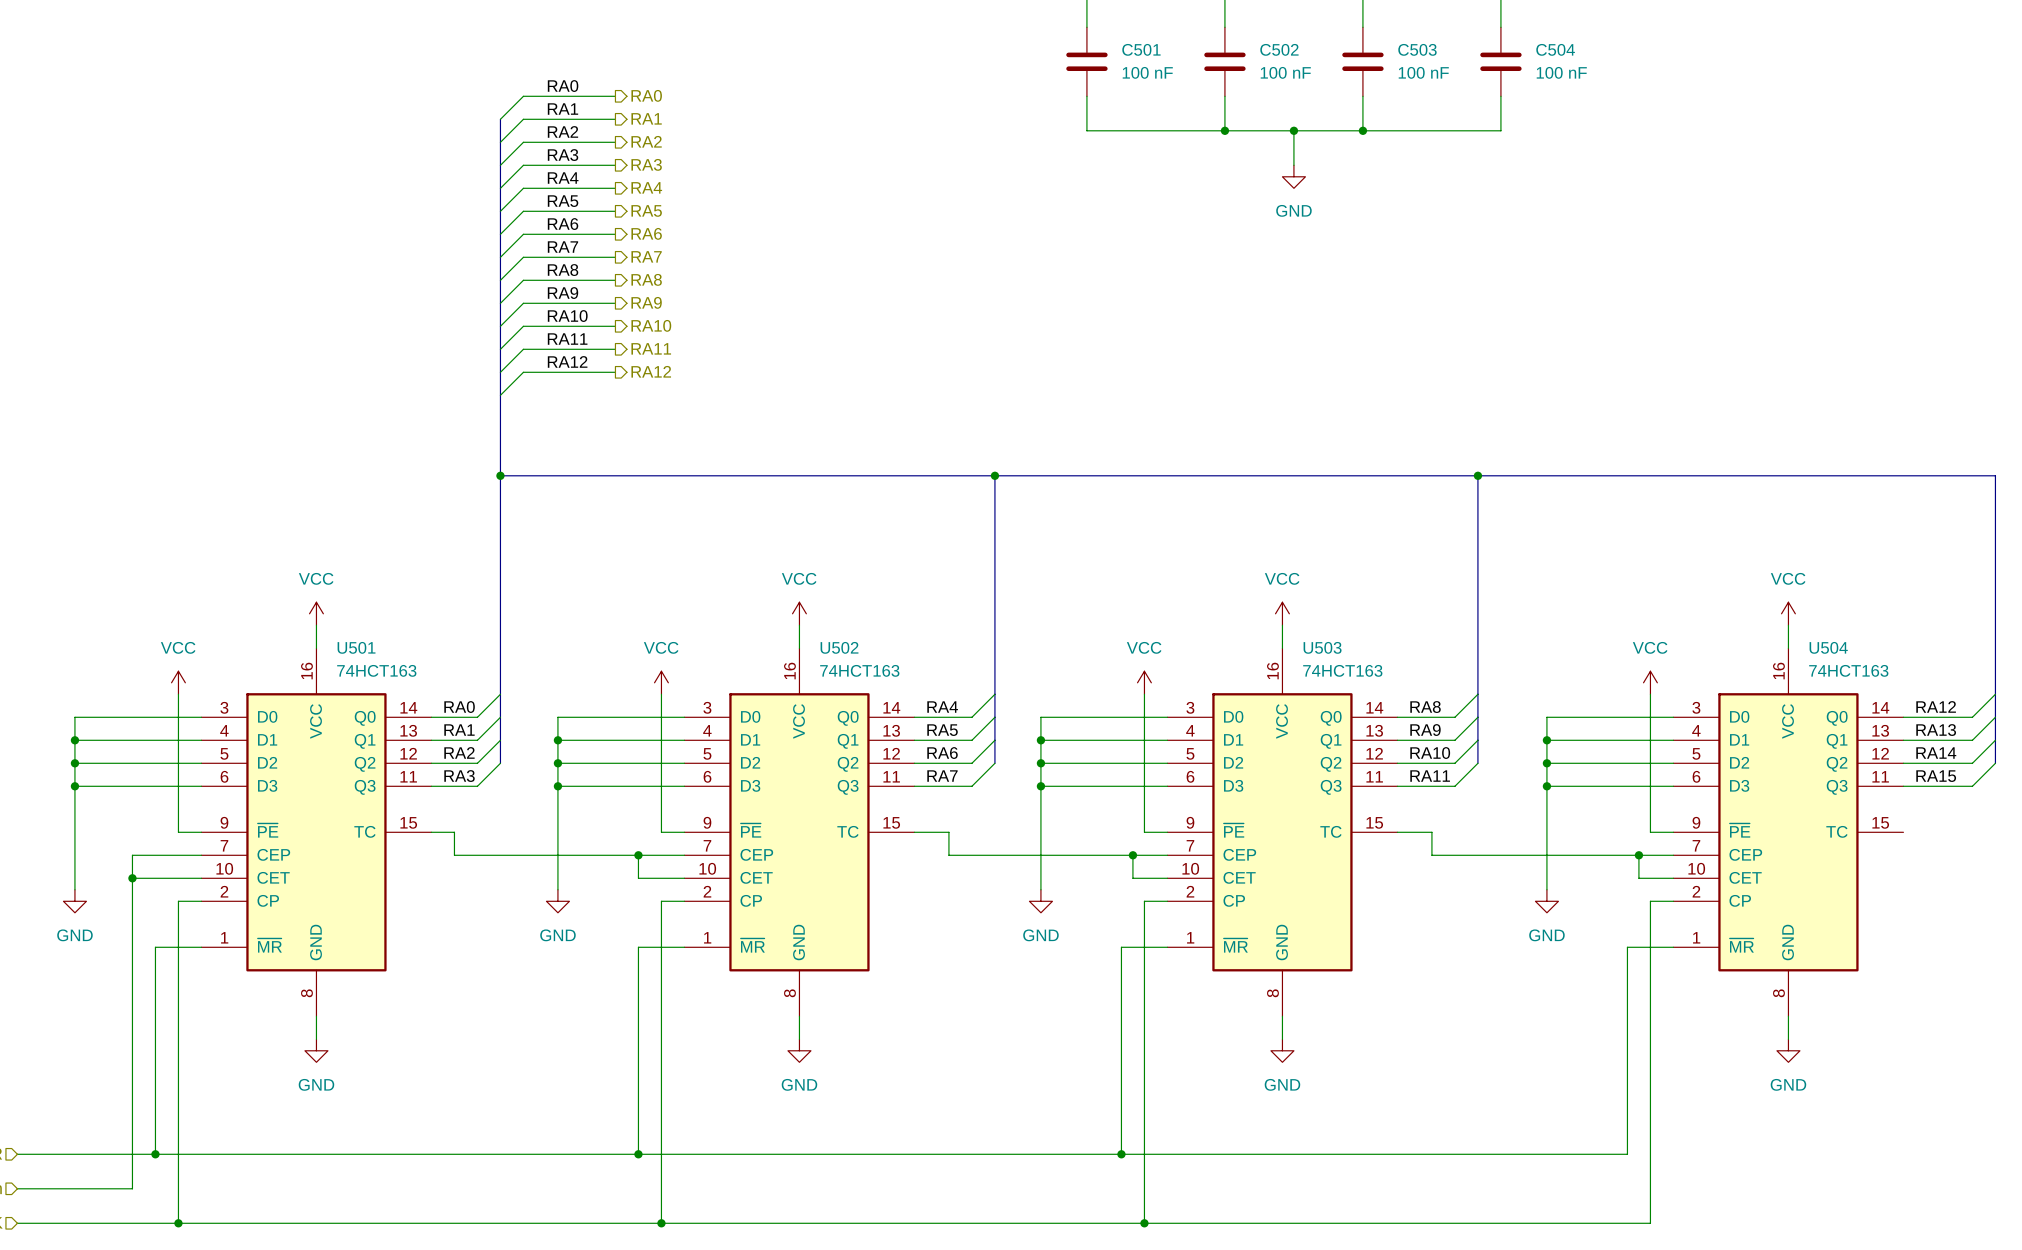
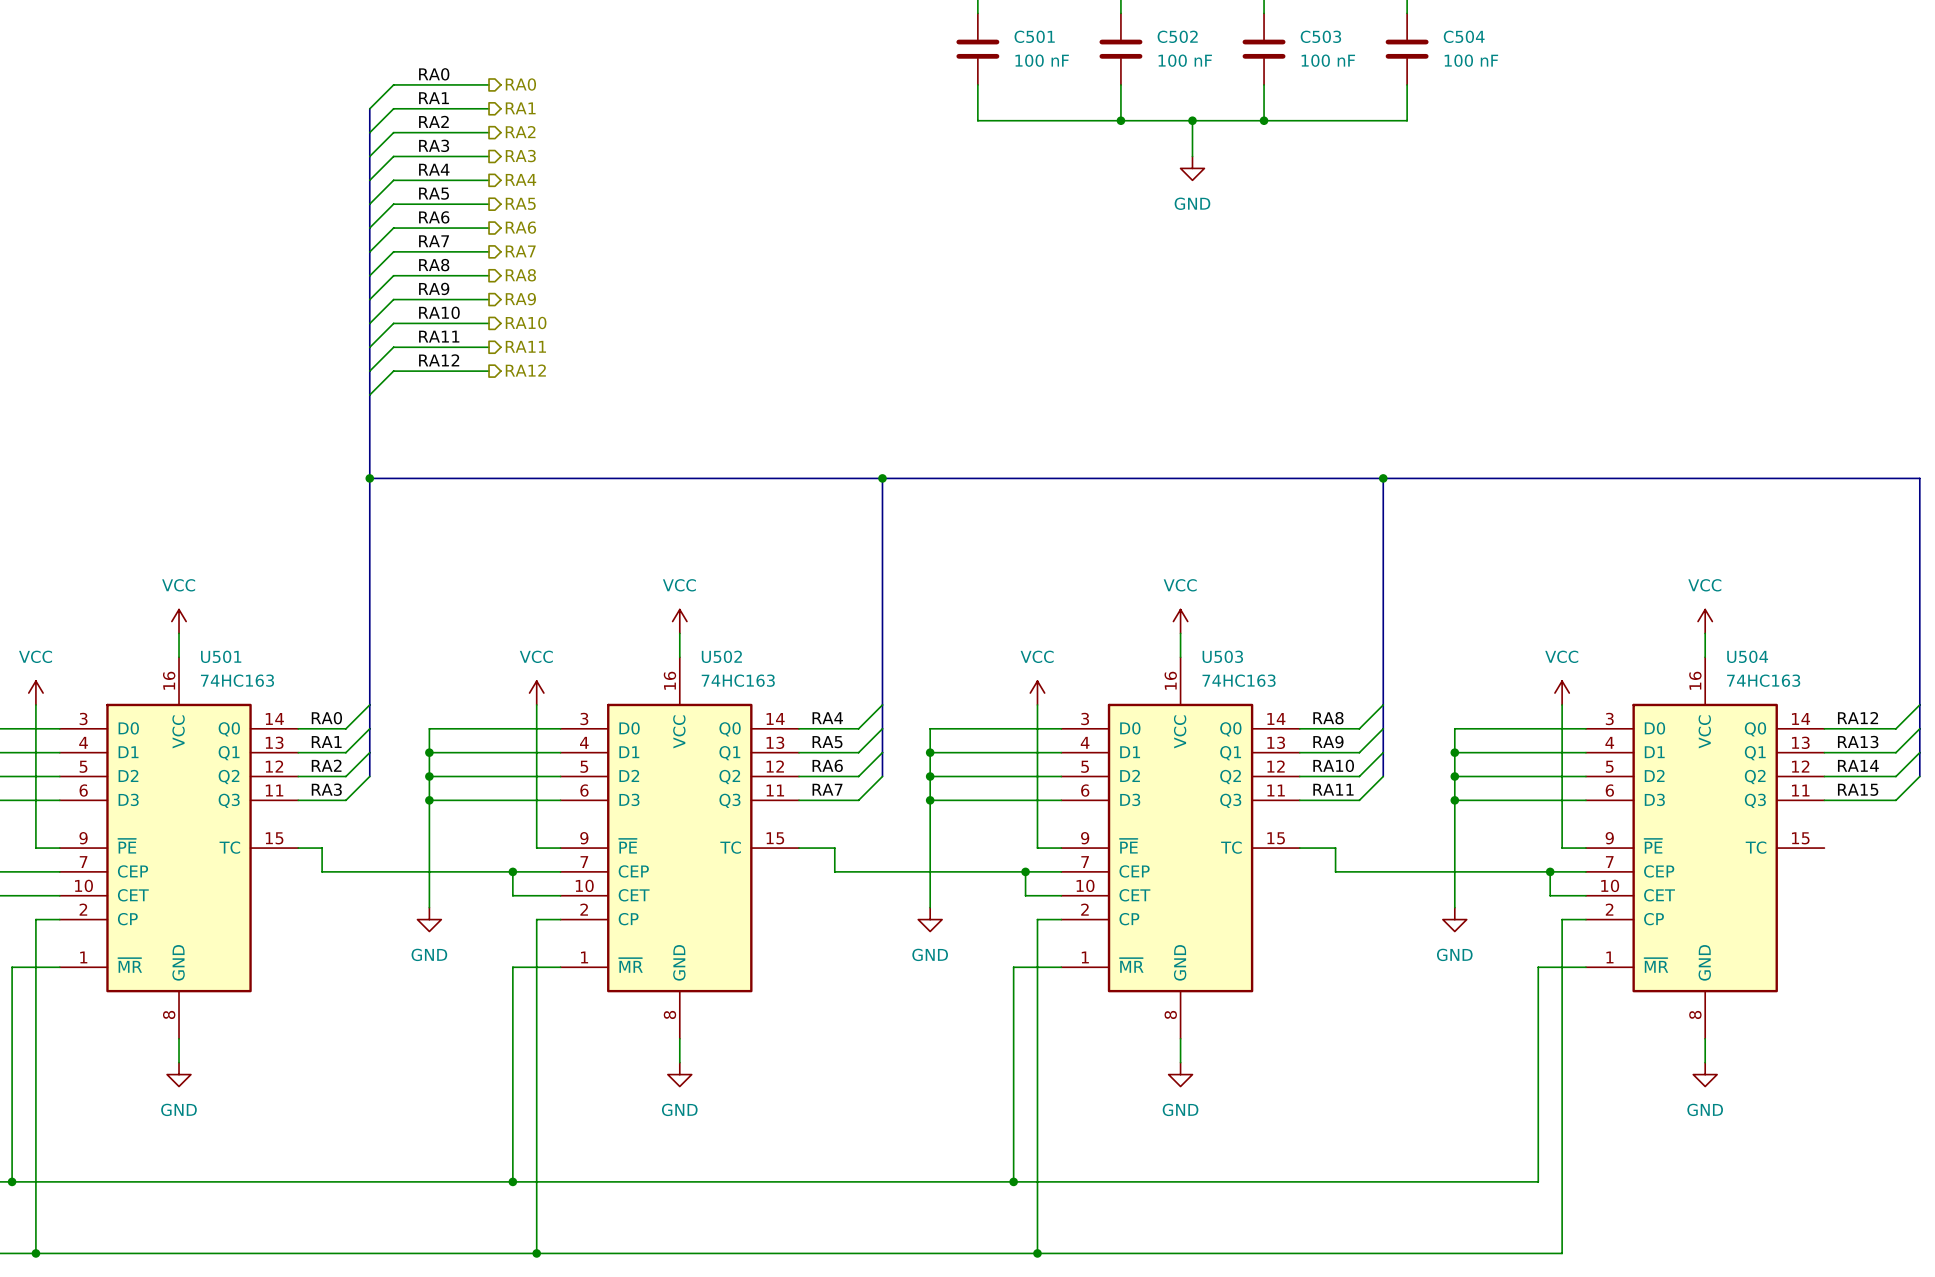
U501 value: 74HCT163 (376, 670) -> 74HC163 (237, 680)
U502 value: 74HCT163 (859, 670) -> 74HC163 (738, 680)
U503 value: 74HCT163 (1342, 670) -> 74HC163 (1239, 680)
U504 value: 74HCT163 (1848, 670) -> 74HC163 (1763, 680)

